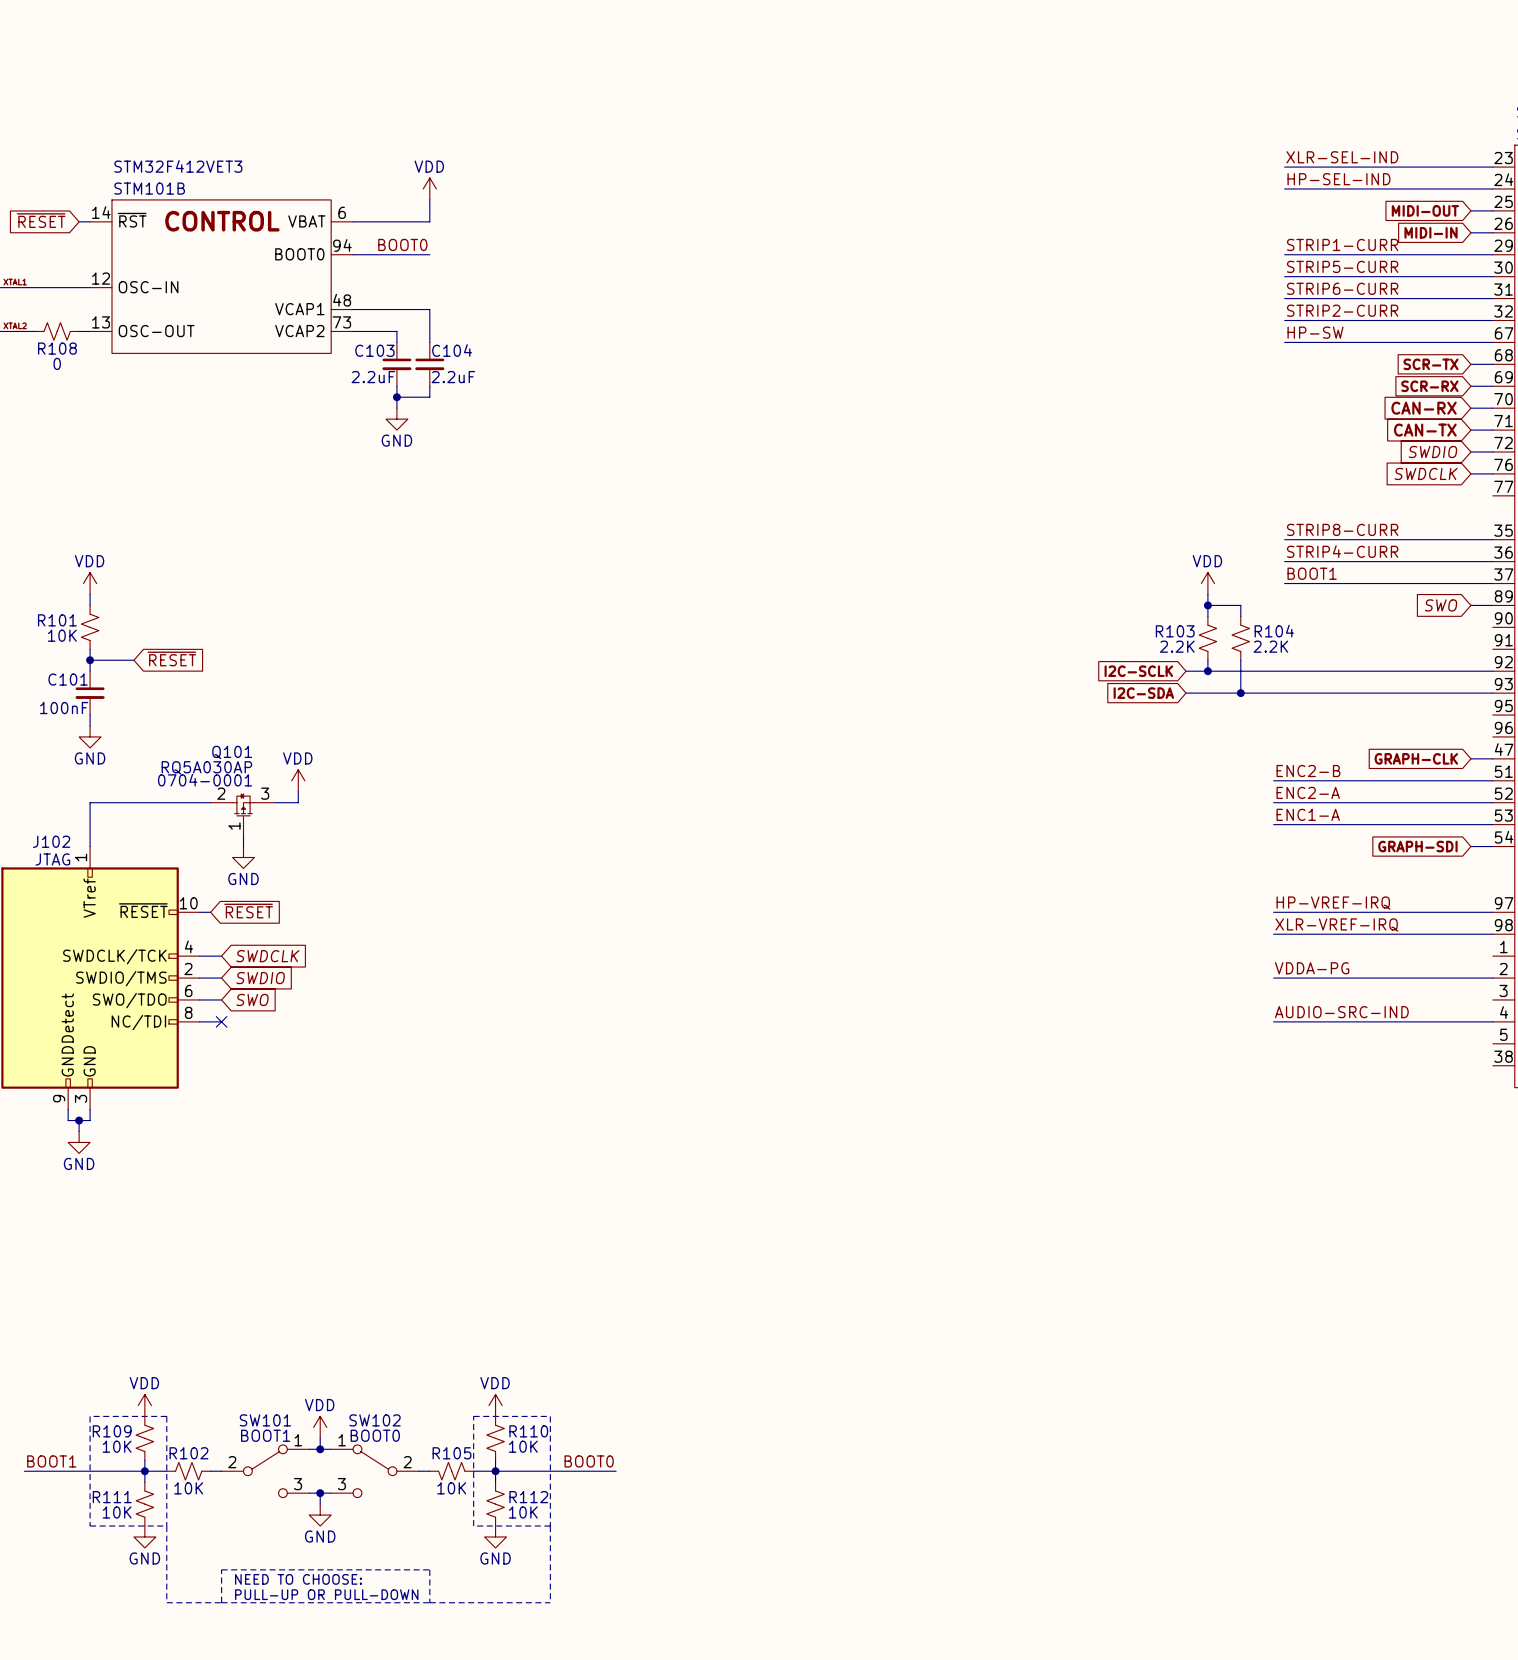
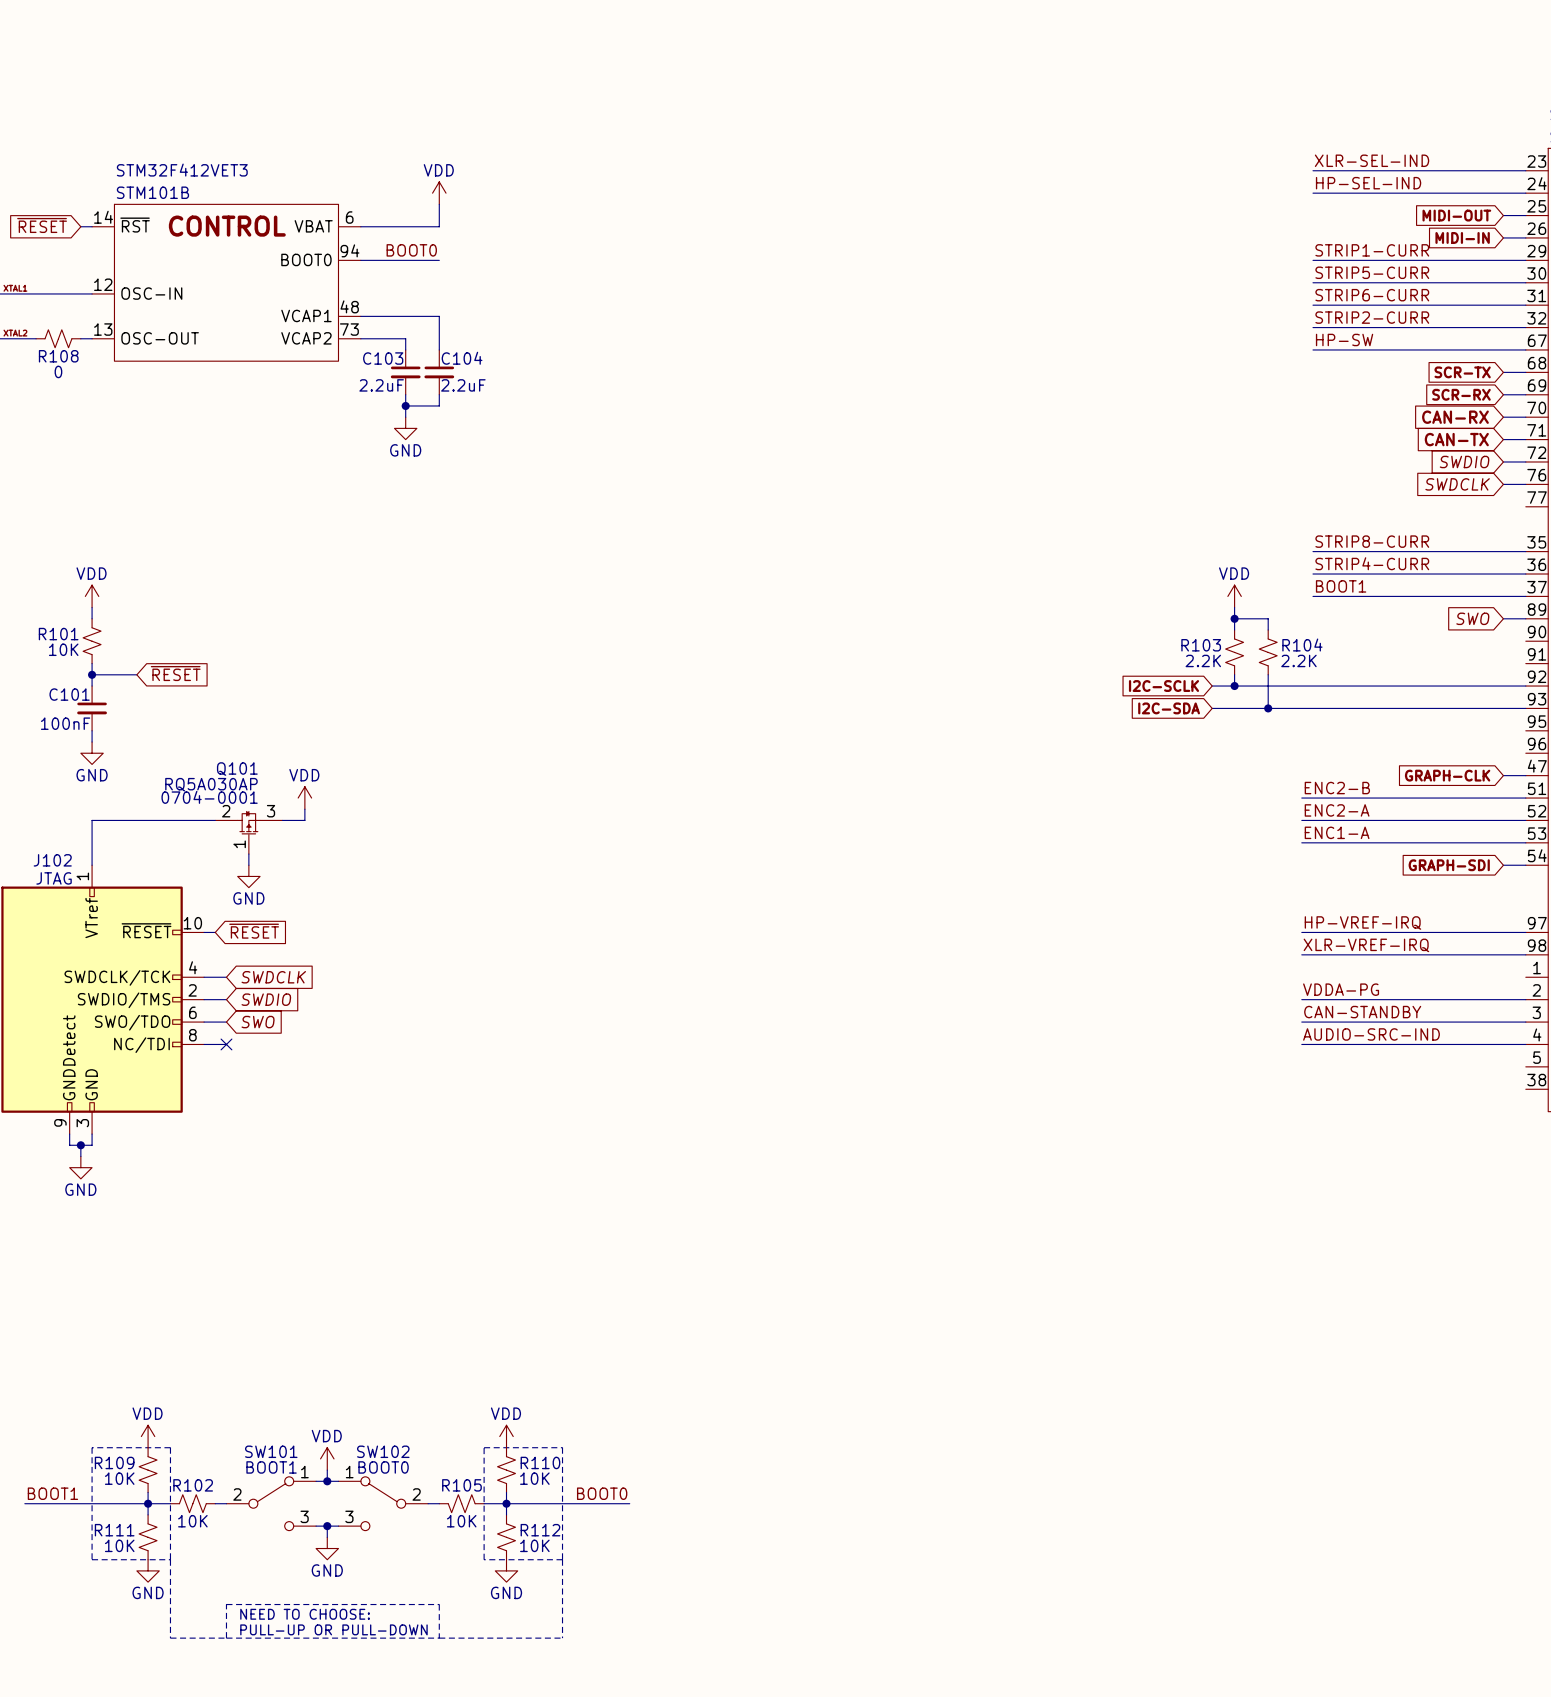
label: none -> CAN-STANDBY (1362, 1012)
wire: none -> (1301, 1022) (1525, 1022)

